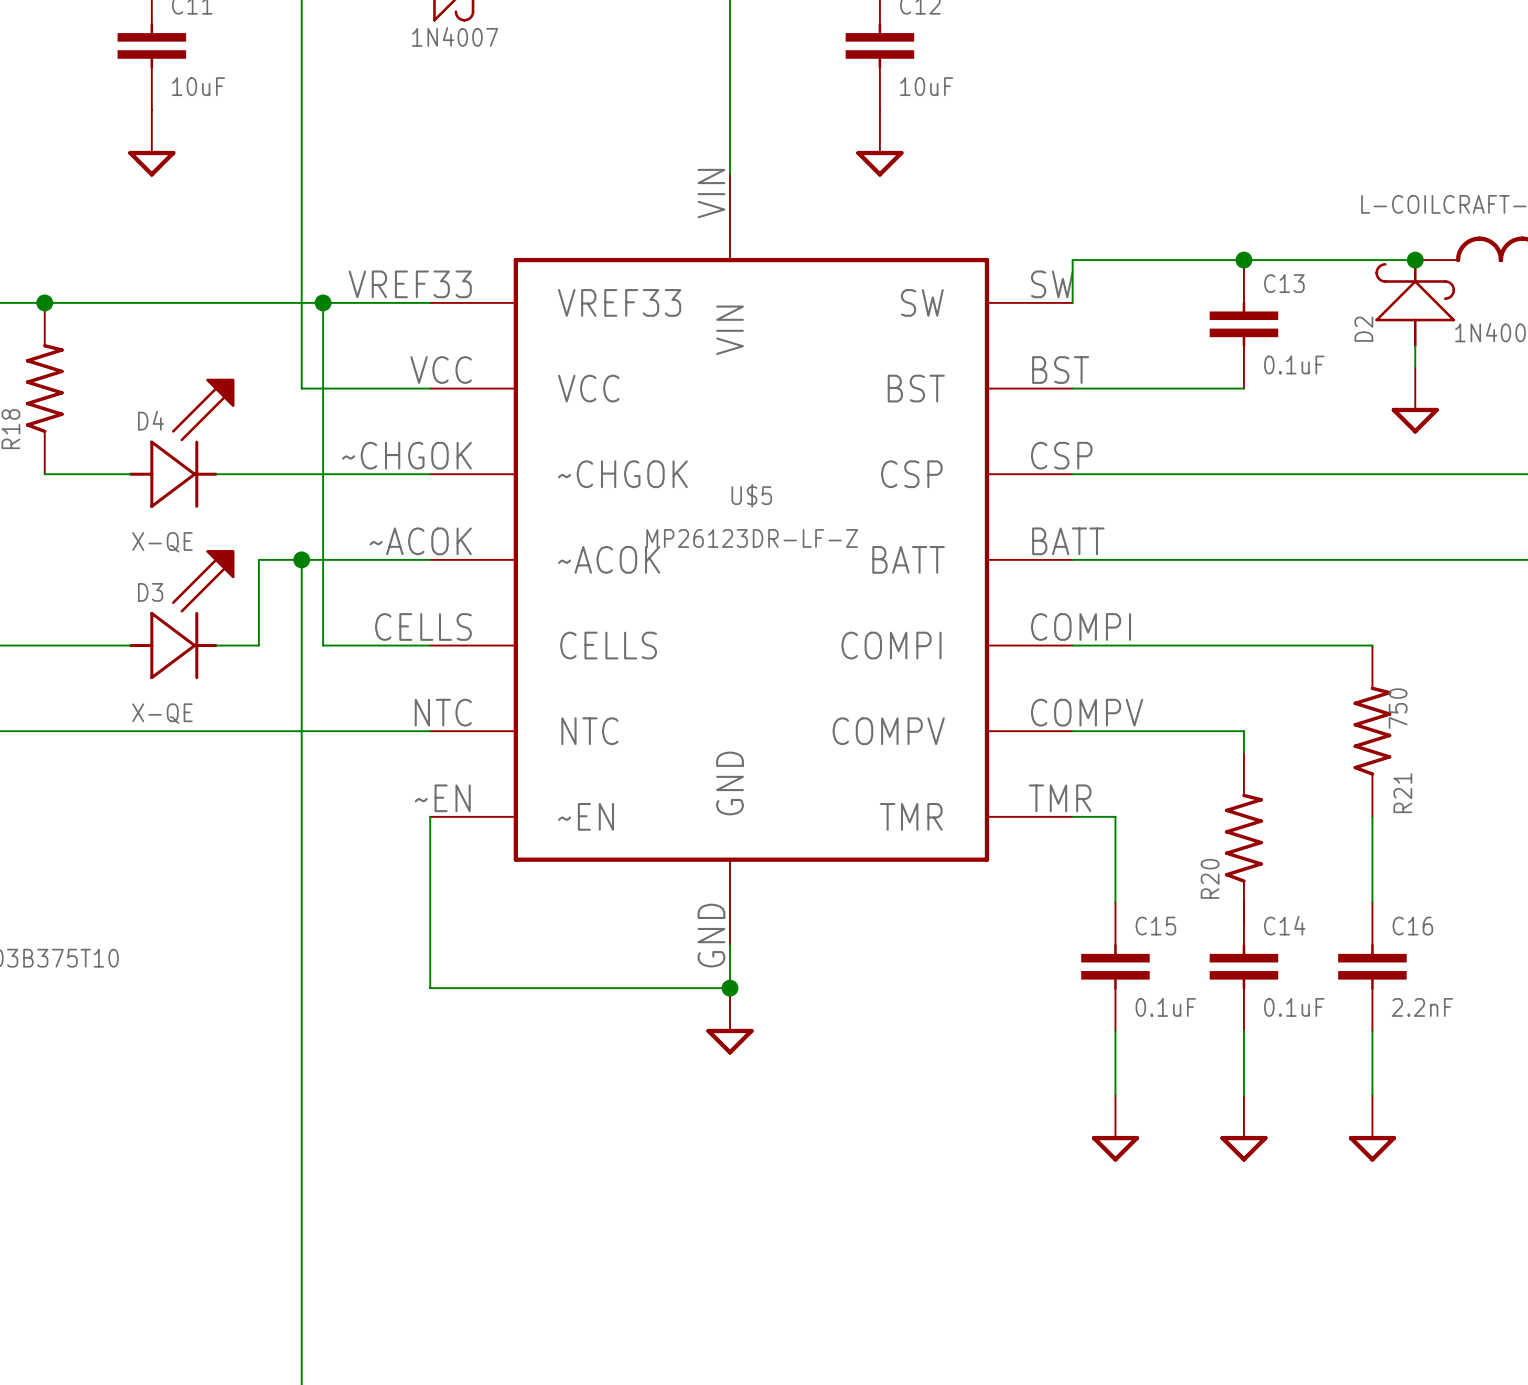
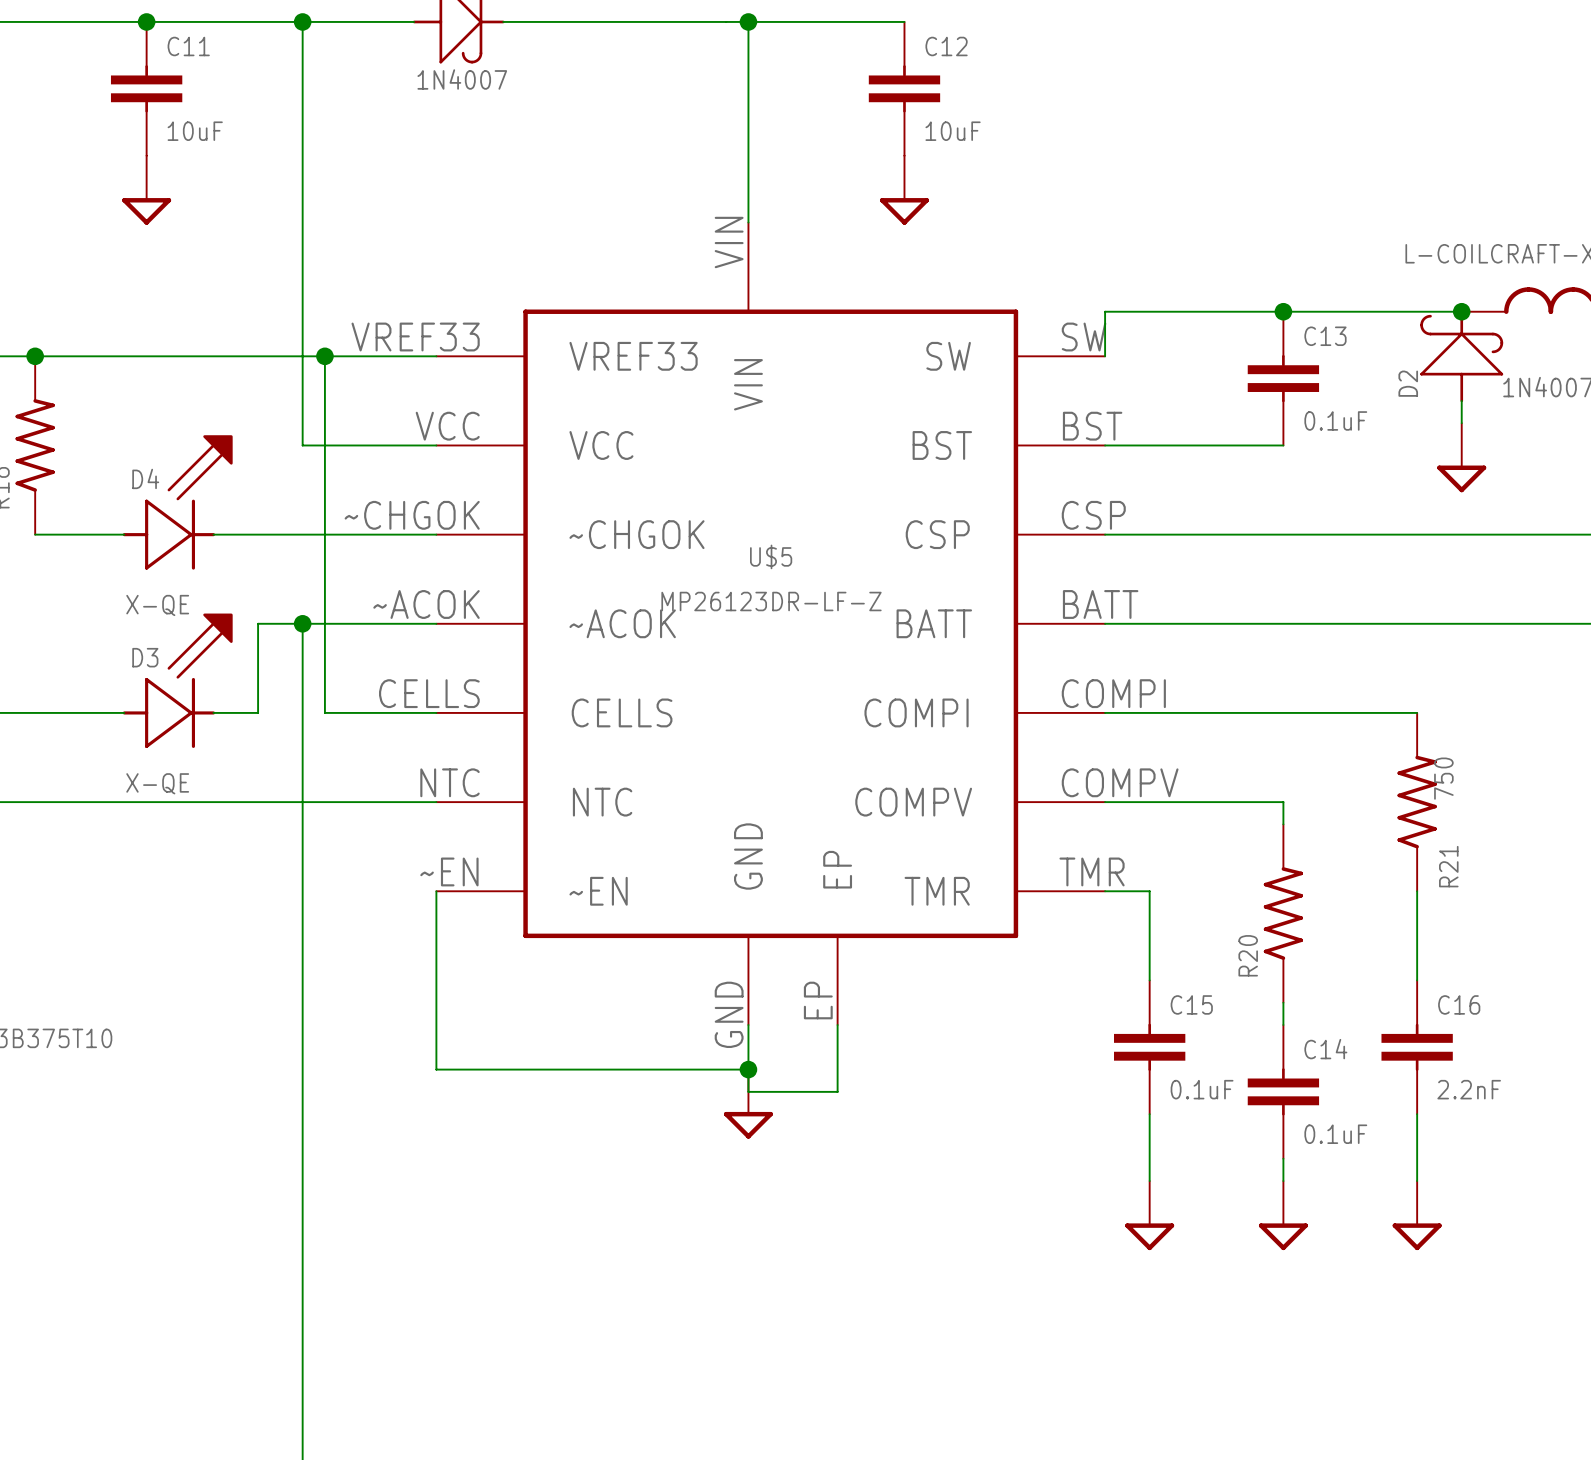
U$5 symbol: [430, 174, 1073, 946] -> [436, 222, 1106, 1026]
wire: none -> (837, 1025) (837, 1091) (748, 1091) (748, 1069)
C14 position: (1243, 966) -> (1283, 1091)

